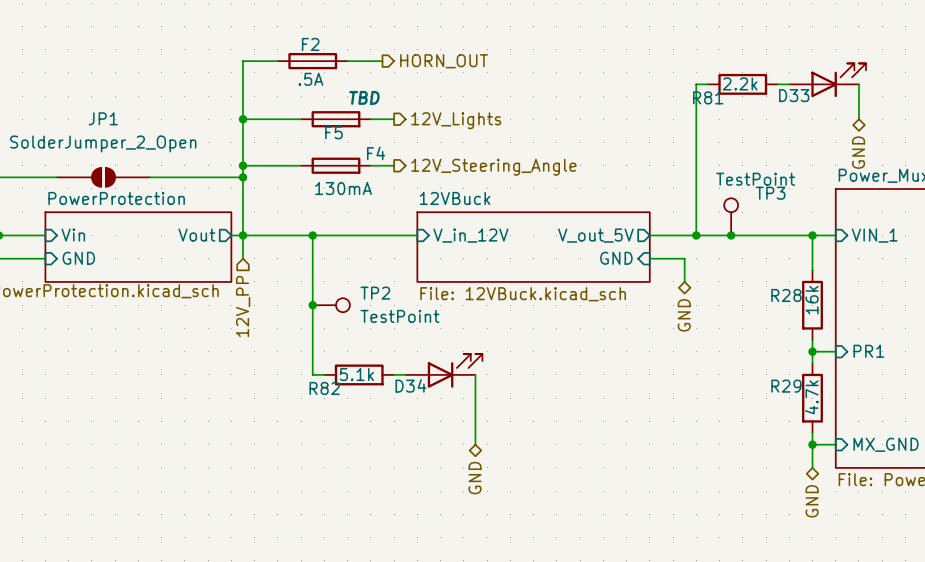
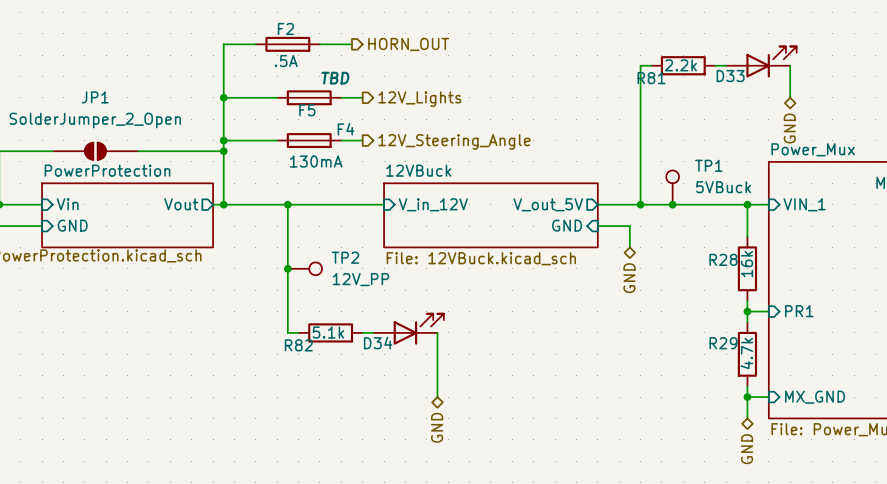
TP3 value: TestPoint (755, 179) -> 5VBuck (723, 187)
TP3 name: TP3 (770, 193) -> TP1 (708, 165)
wire: (243, 235) (243, 258) -> none
hierarchical label: 12V_PP (243, 306) -> none
TP2 value: TestPoint (399, 316) -> 12V_PP (360, 279)

